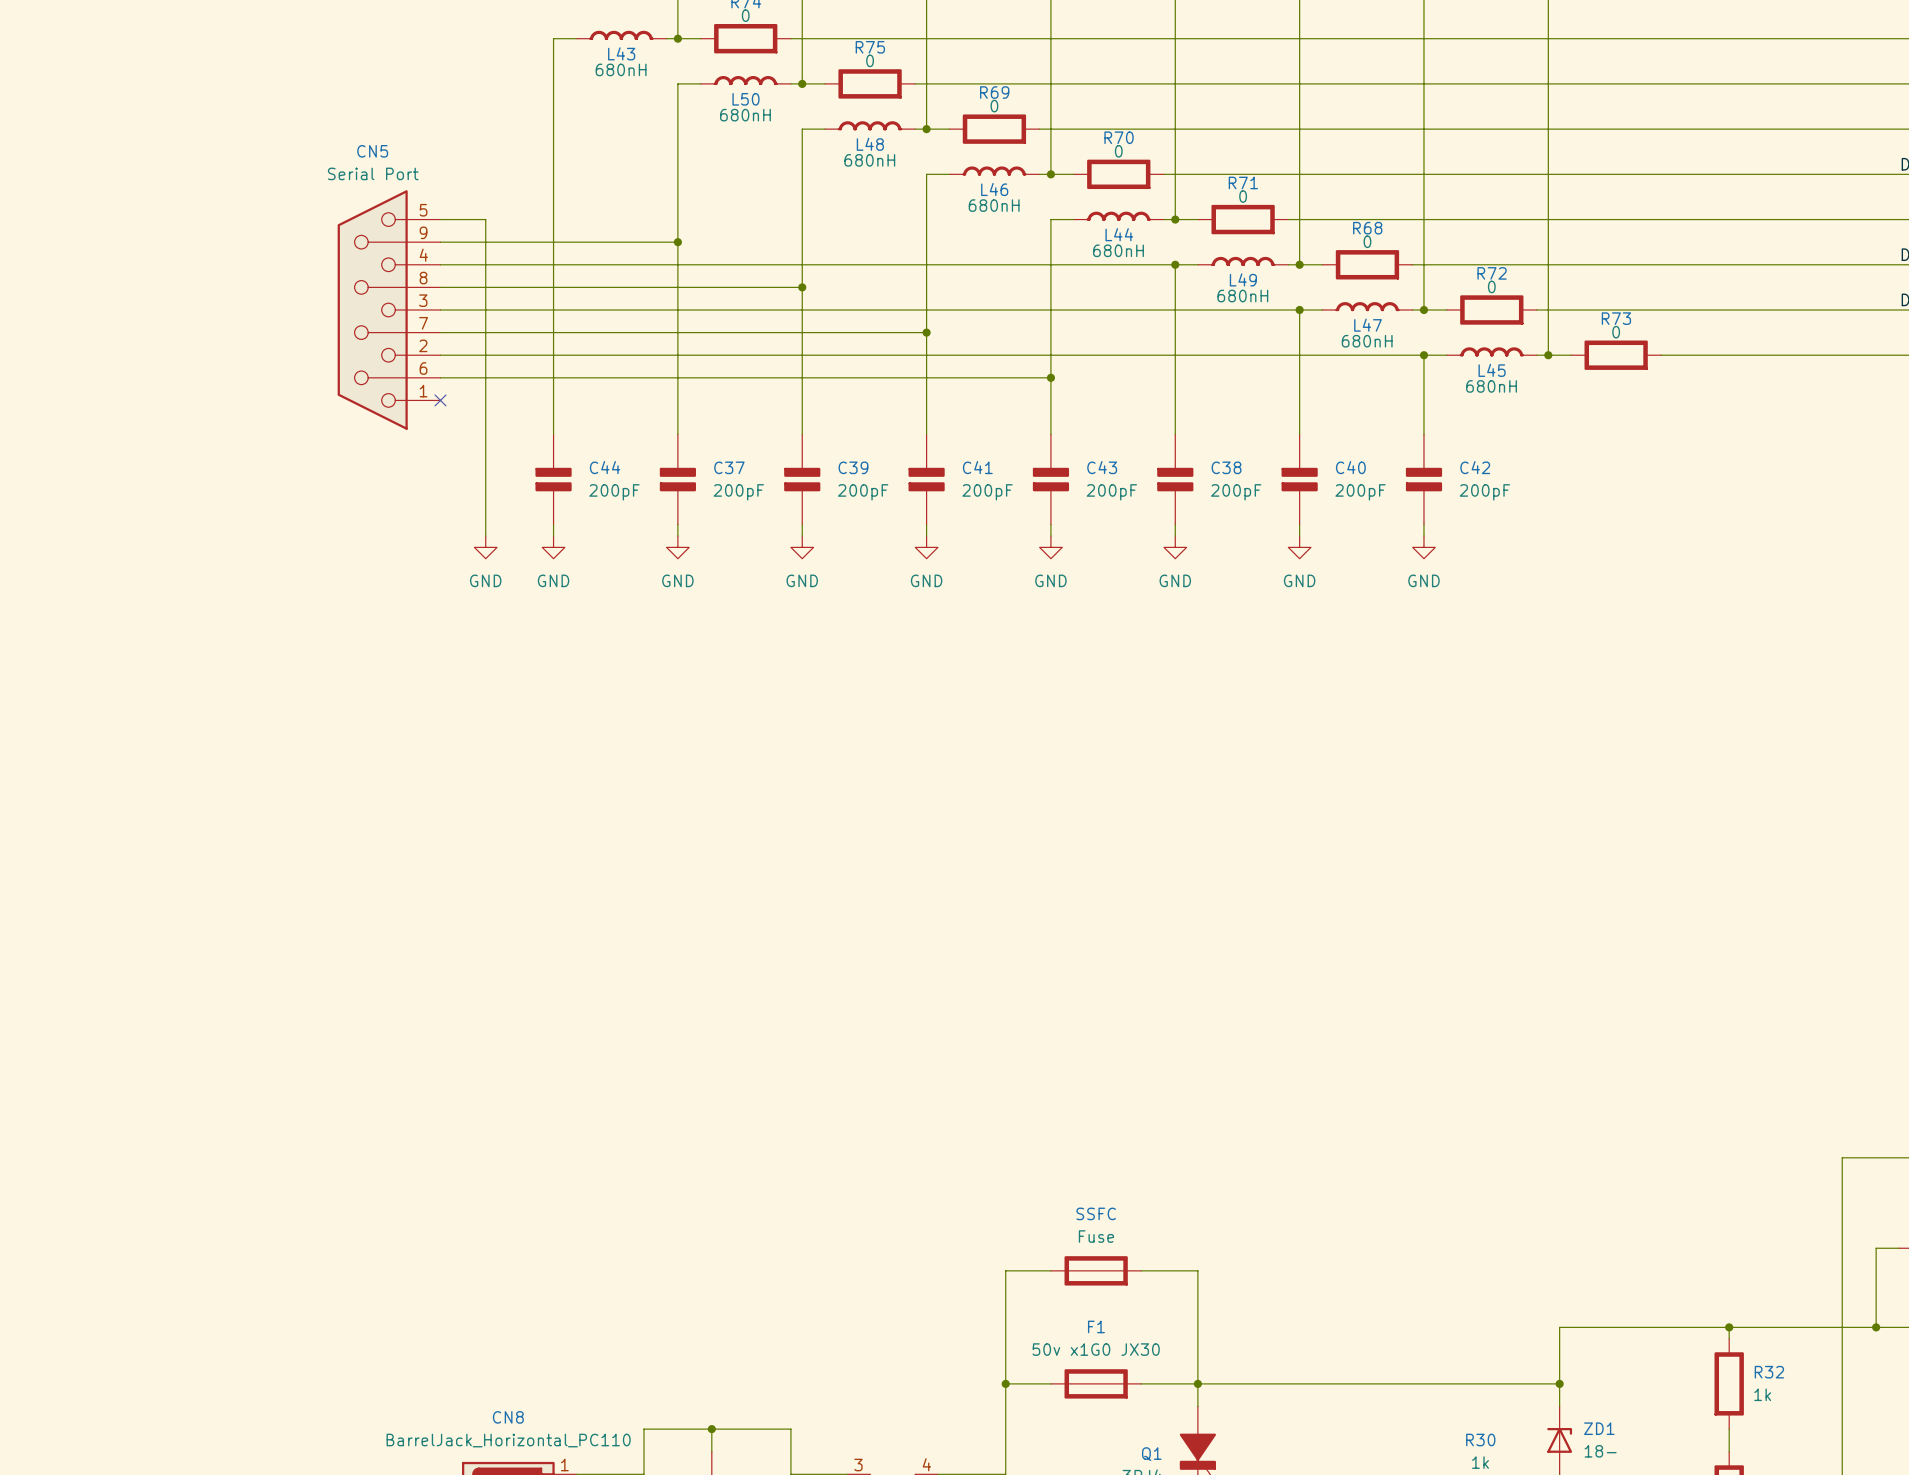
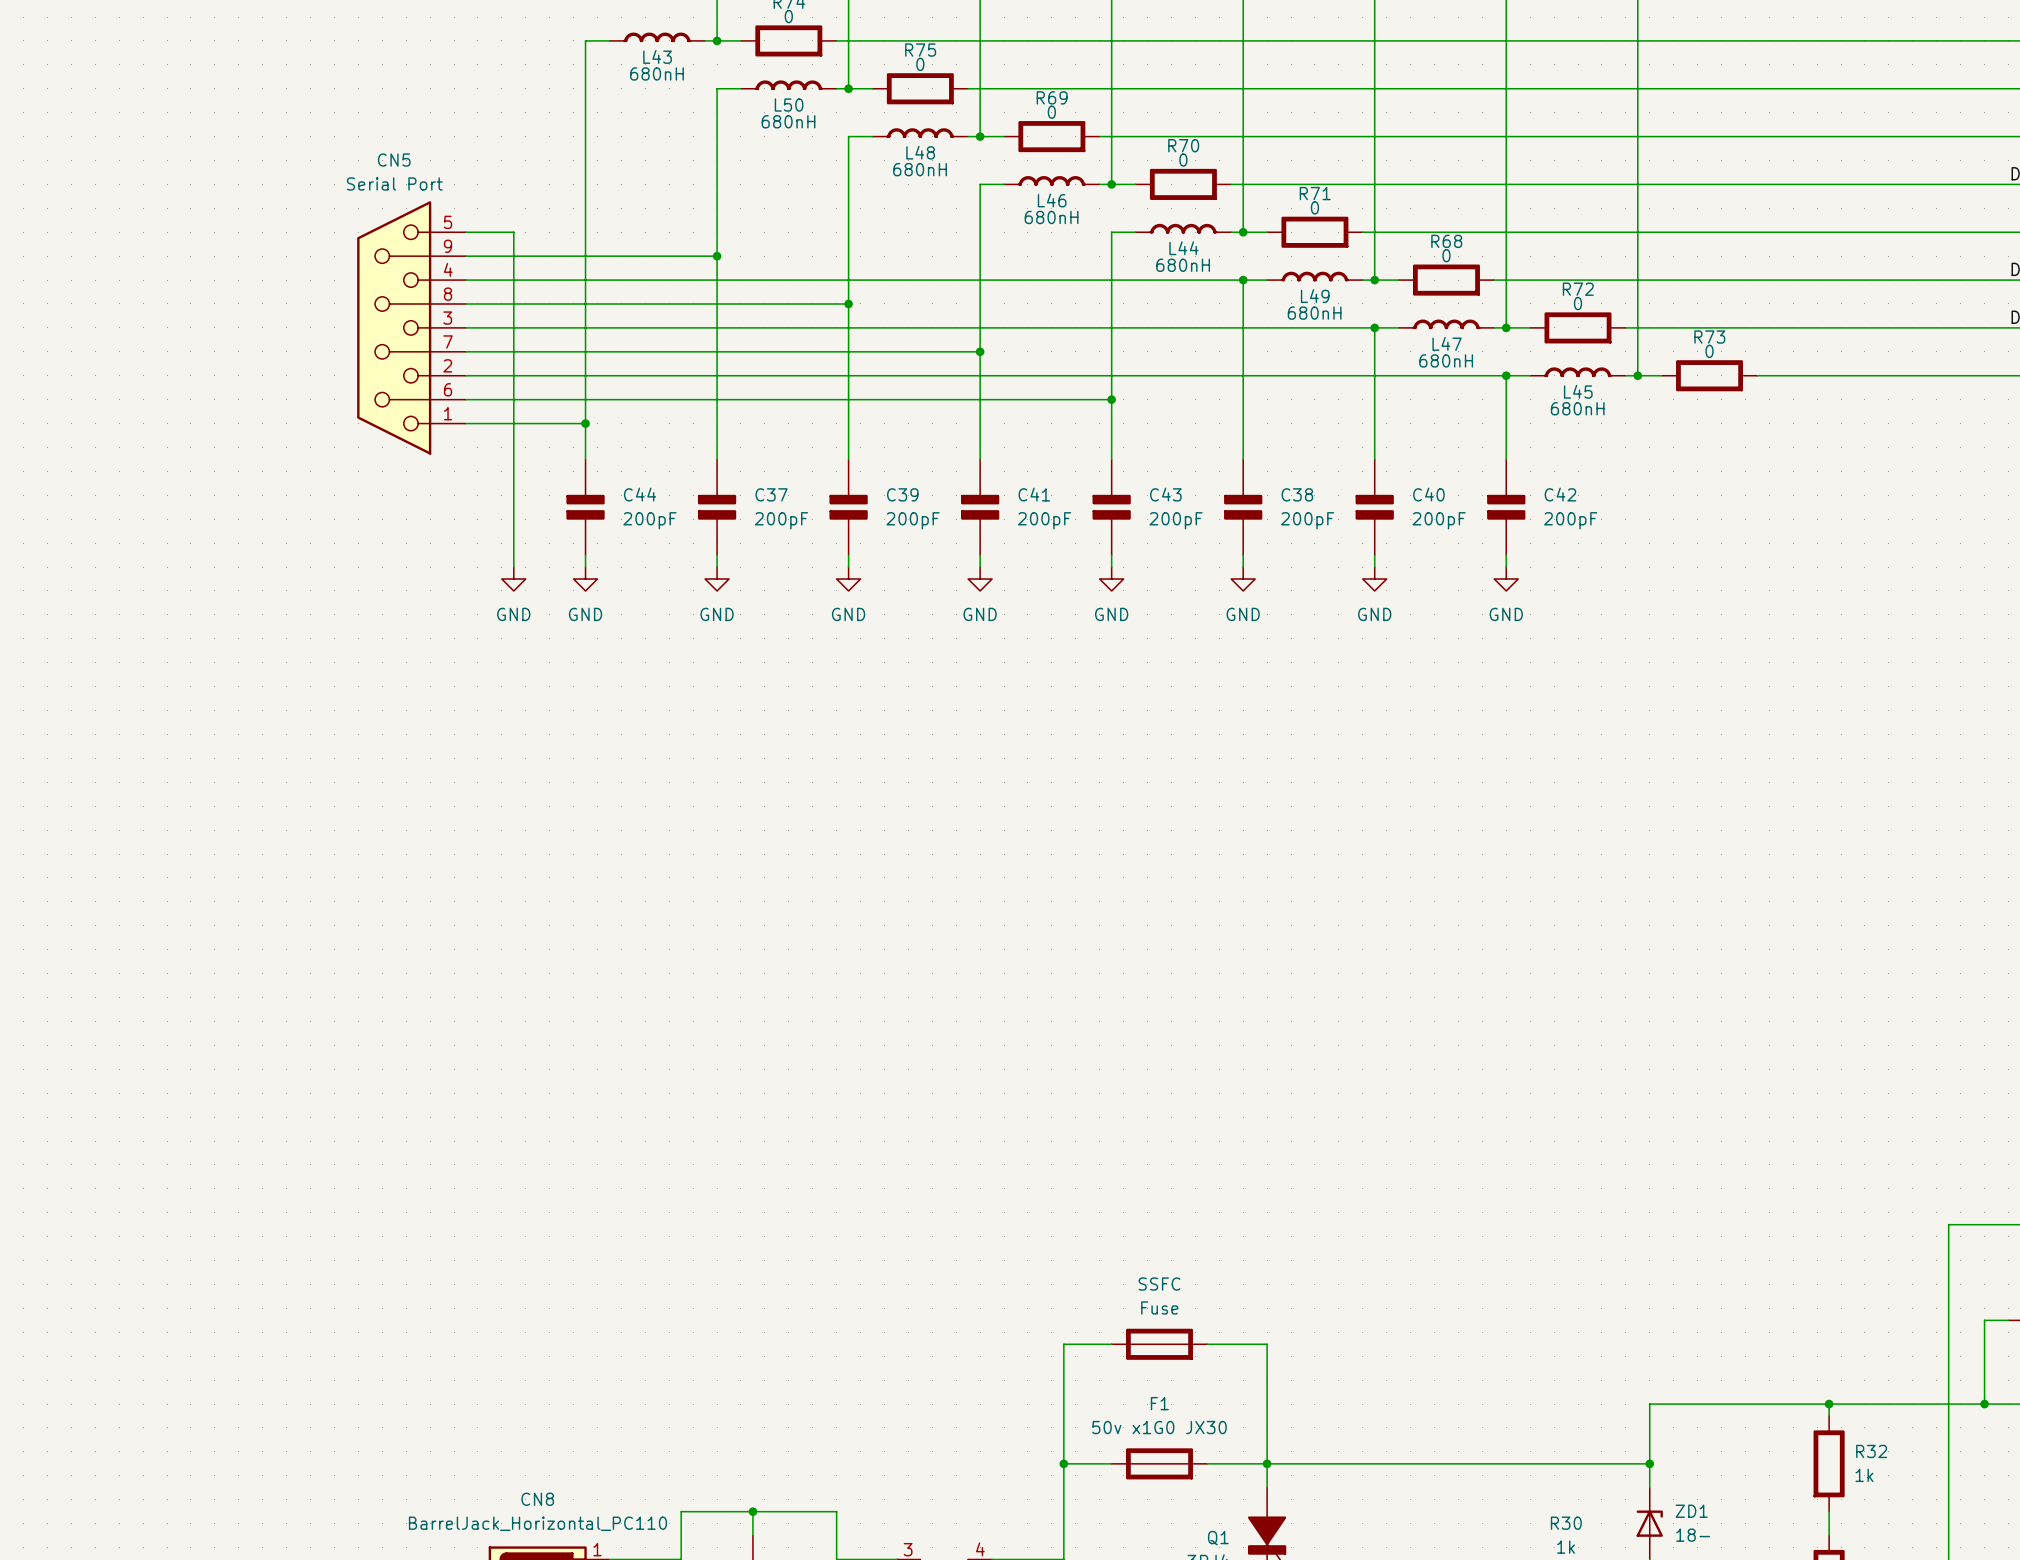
wire: none -> (465, 423) (585, 423)
no-connect mark: (440, 400) -> none
junction: none -> (585, 423)

